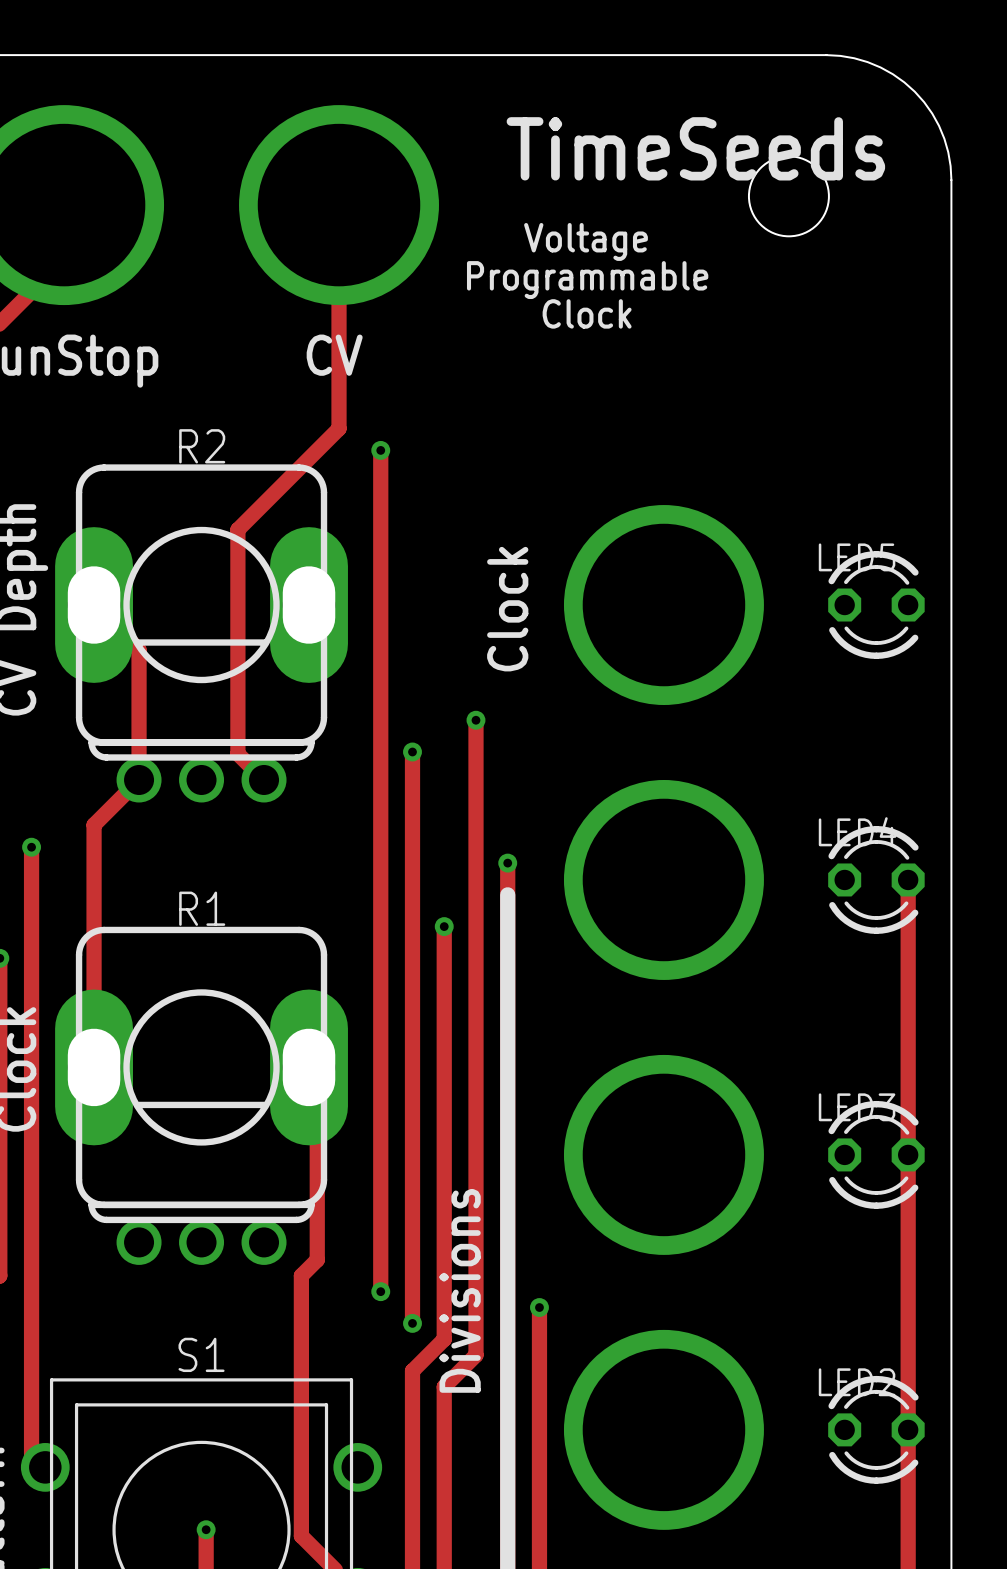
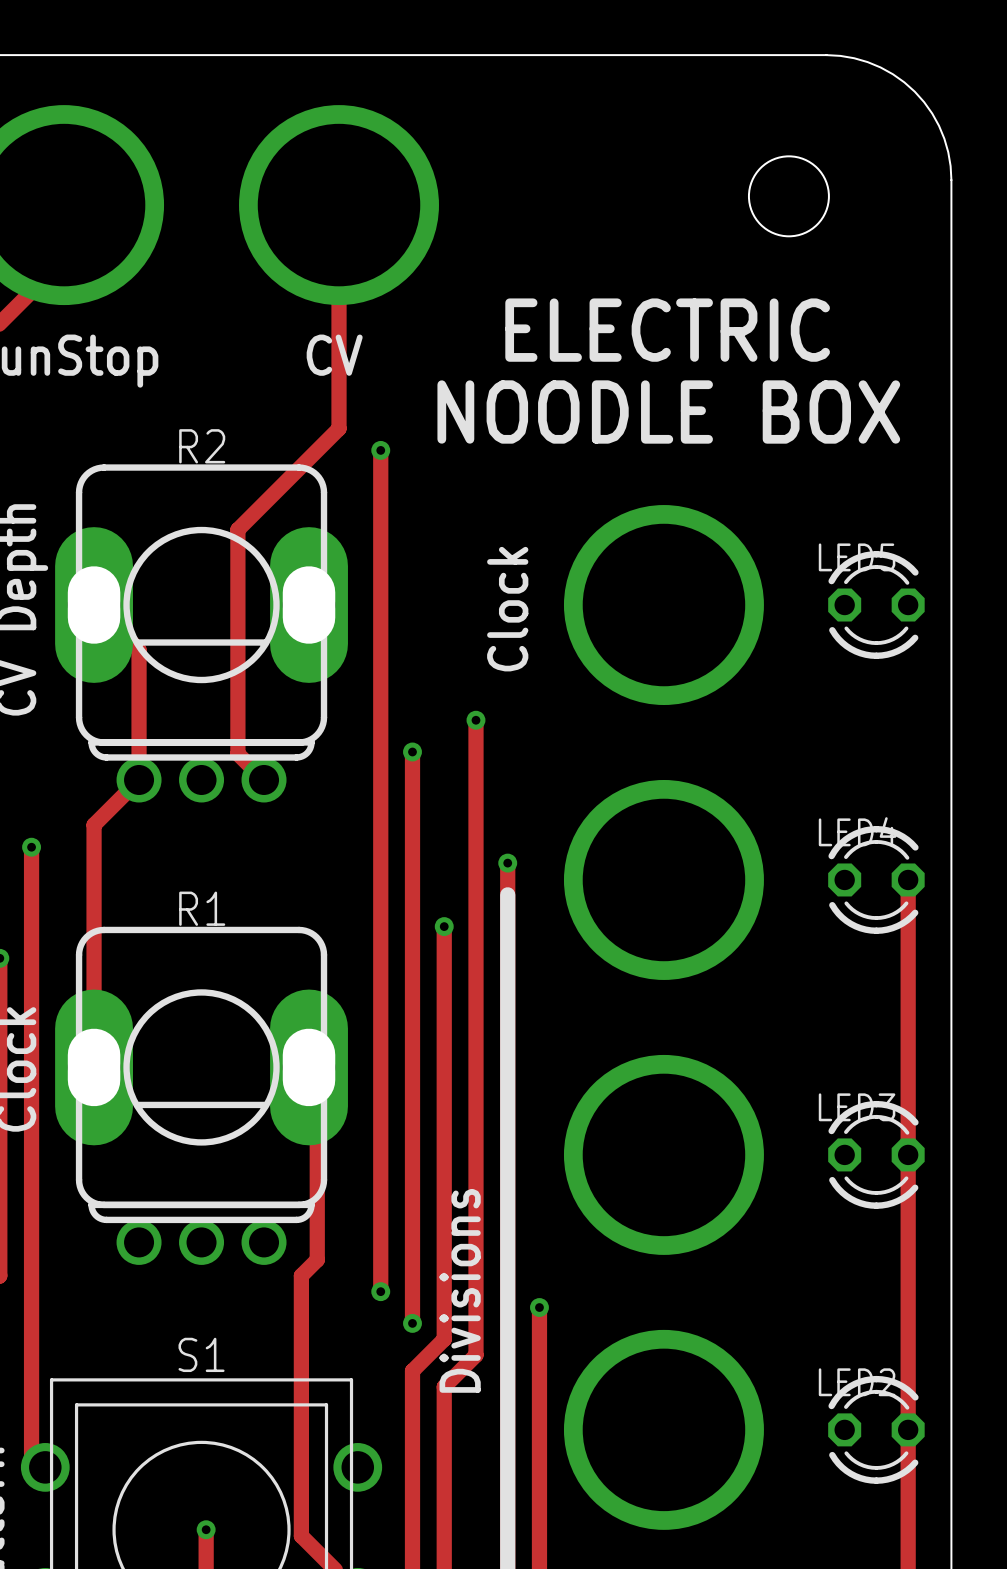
text: TimeSeeds (695, 148) -> none
text: Voltage (586, 241) -> none
text: Programmable (587, 280) -> none
text: Clock (587, 313) -> none
text: none -> ELECTRIC (667, 330)
text: none -> NOODLE BOX (668, 412)

